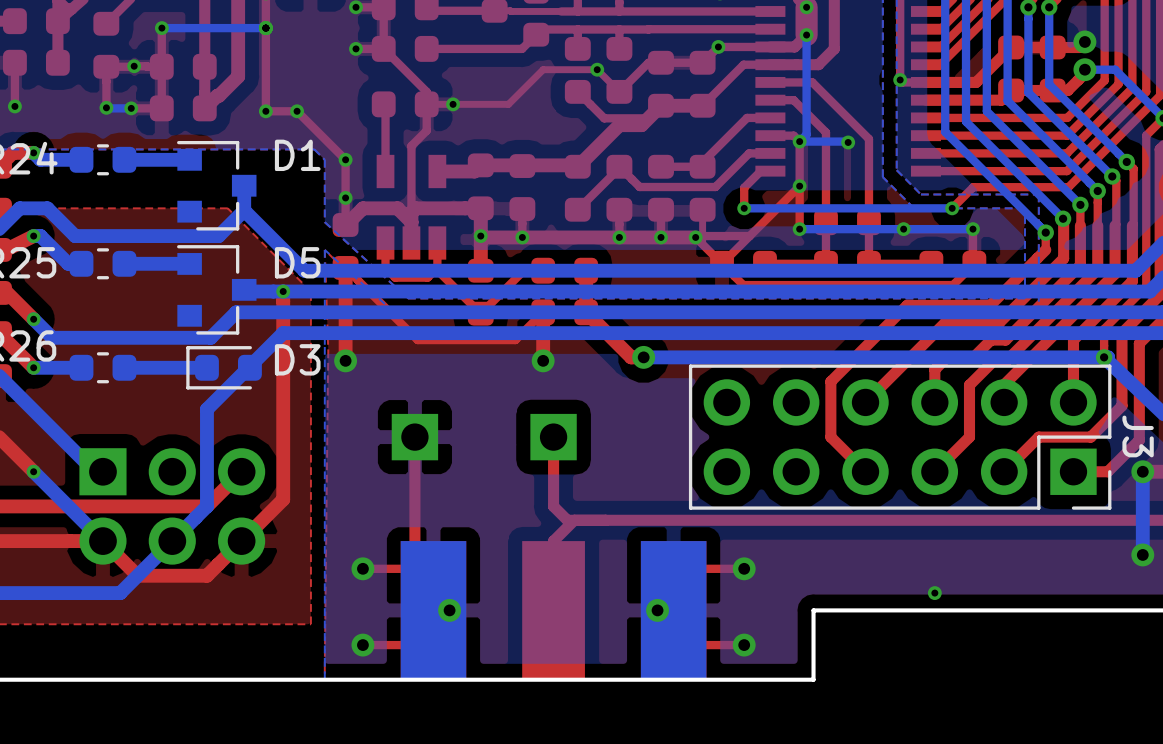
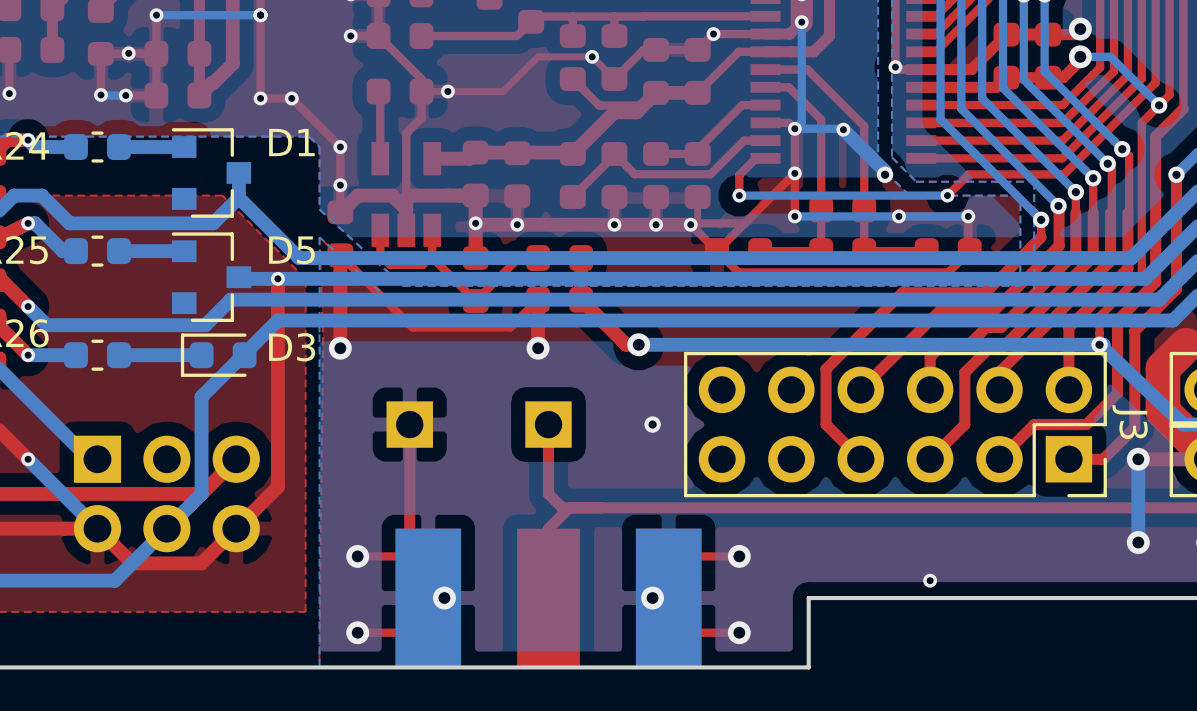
bottom track: none -> (843, 129) (885, 171) (885, 174)
via: none -> (885, 174)
via: none -> (652, 424)

